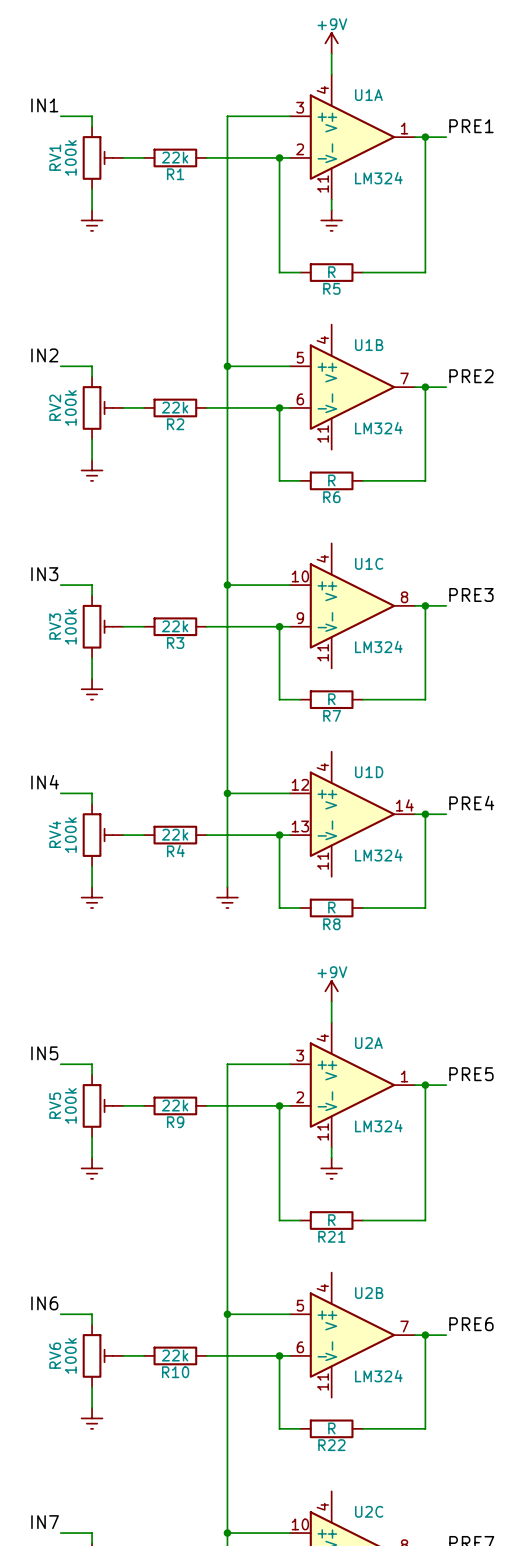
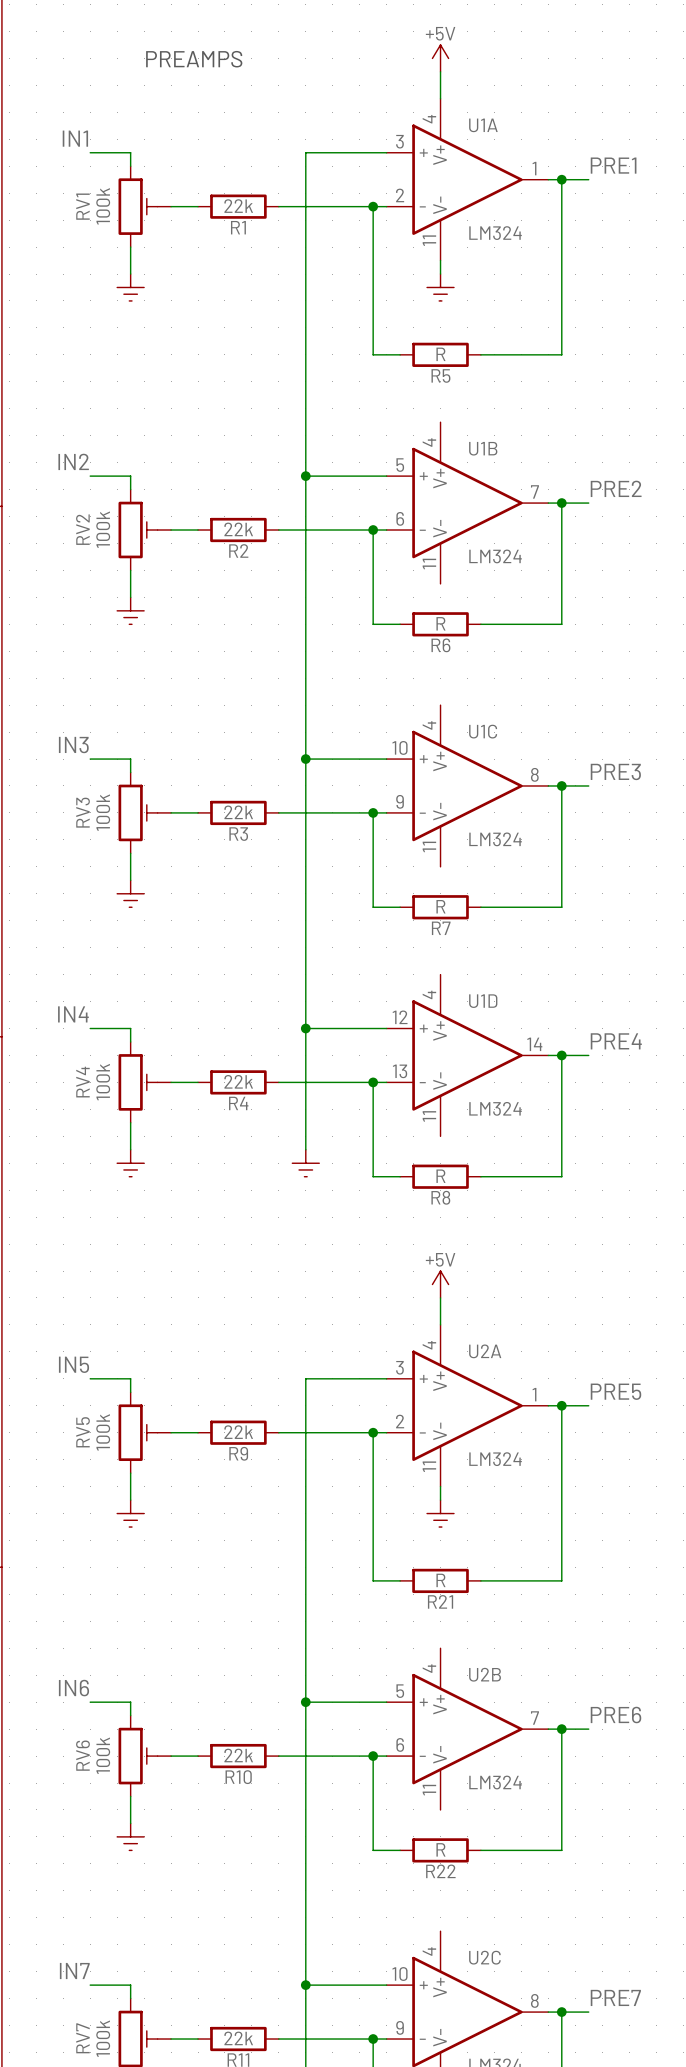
text: none -> PREAMPS (194, 59)
power symbol: +9V (331, 43) -> +5V (440, 58)
power symbol: +9V (331, 991) -> +5V (440, 1284)

